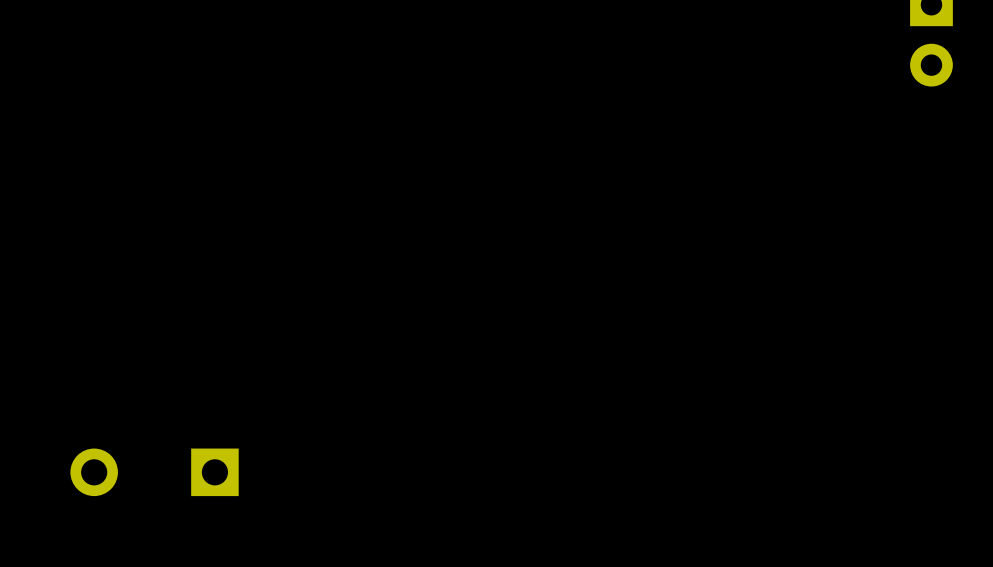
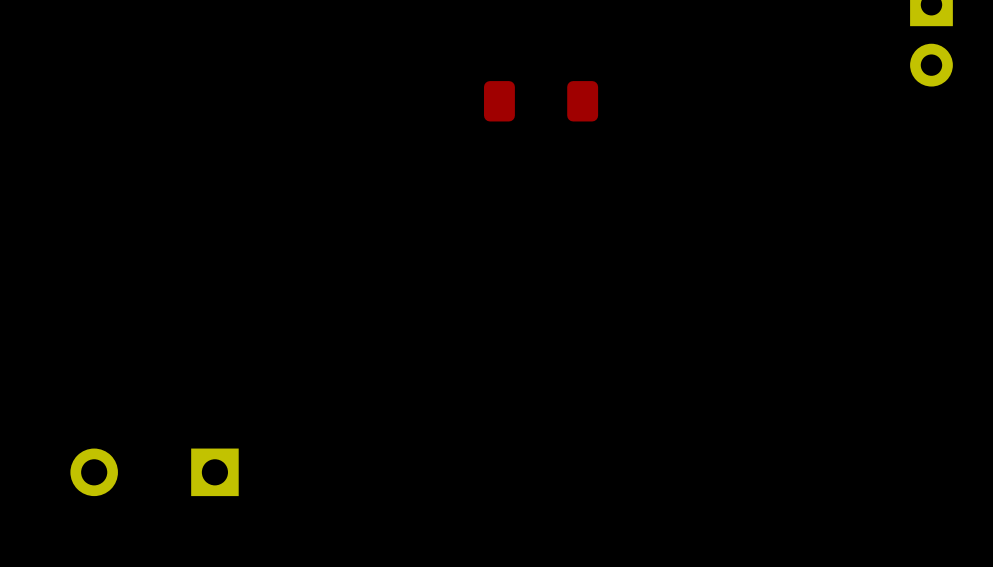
part: none -> (541, 101)

